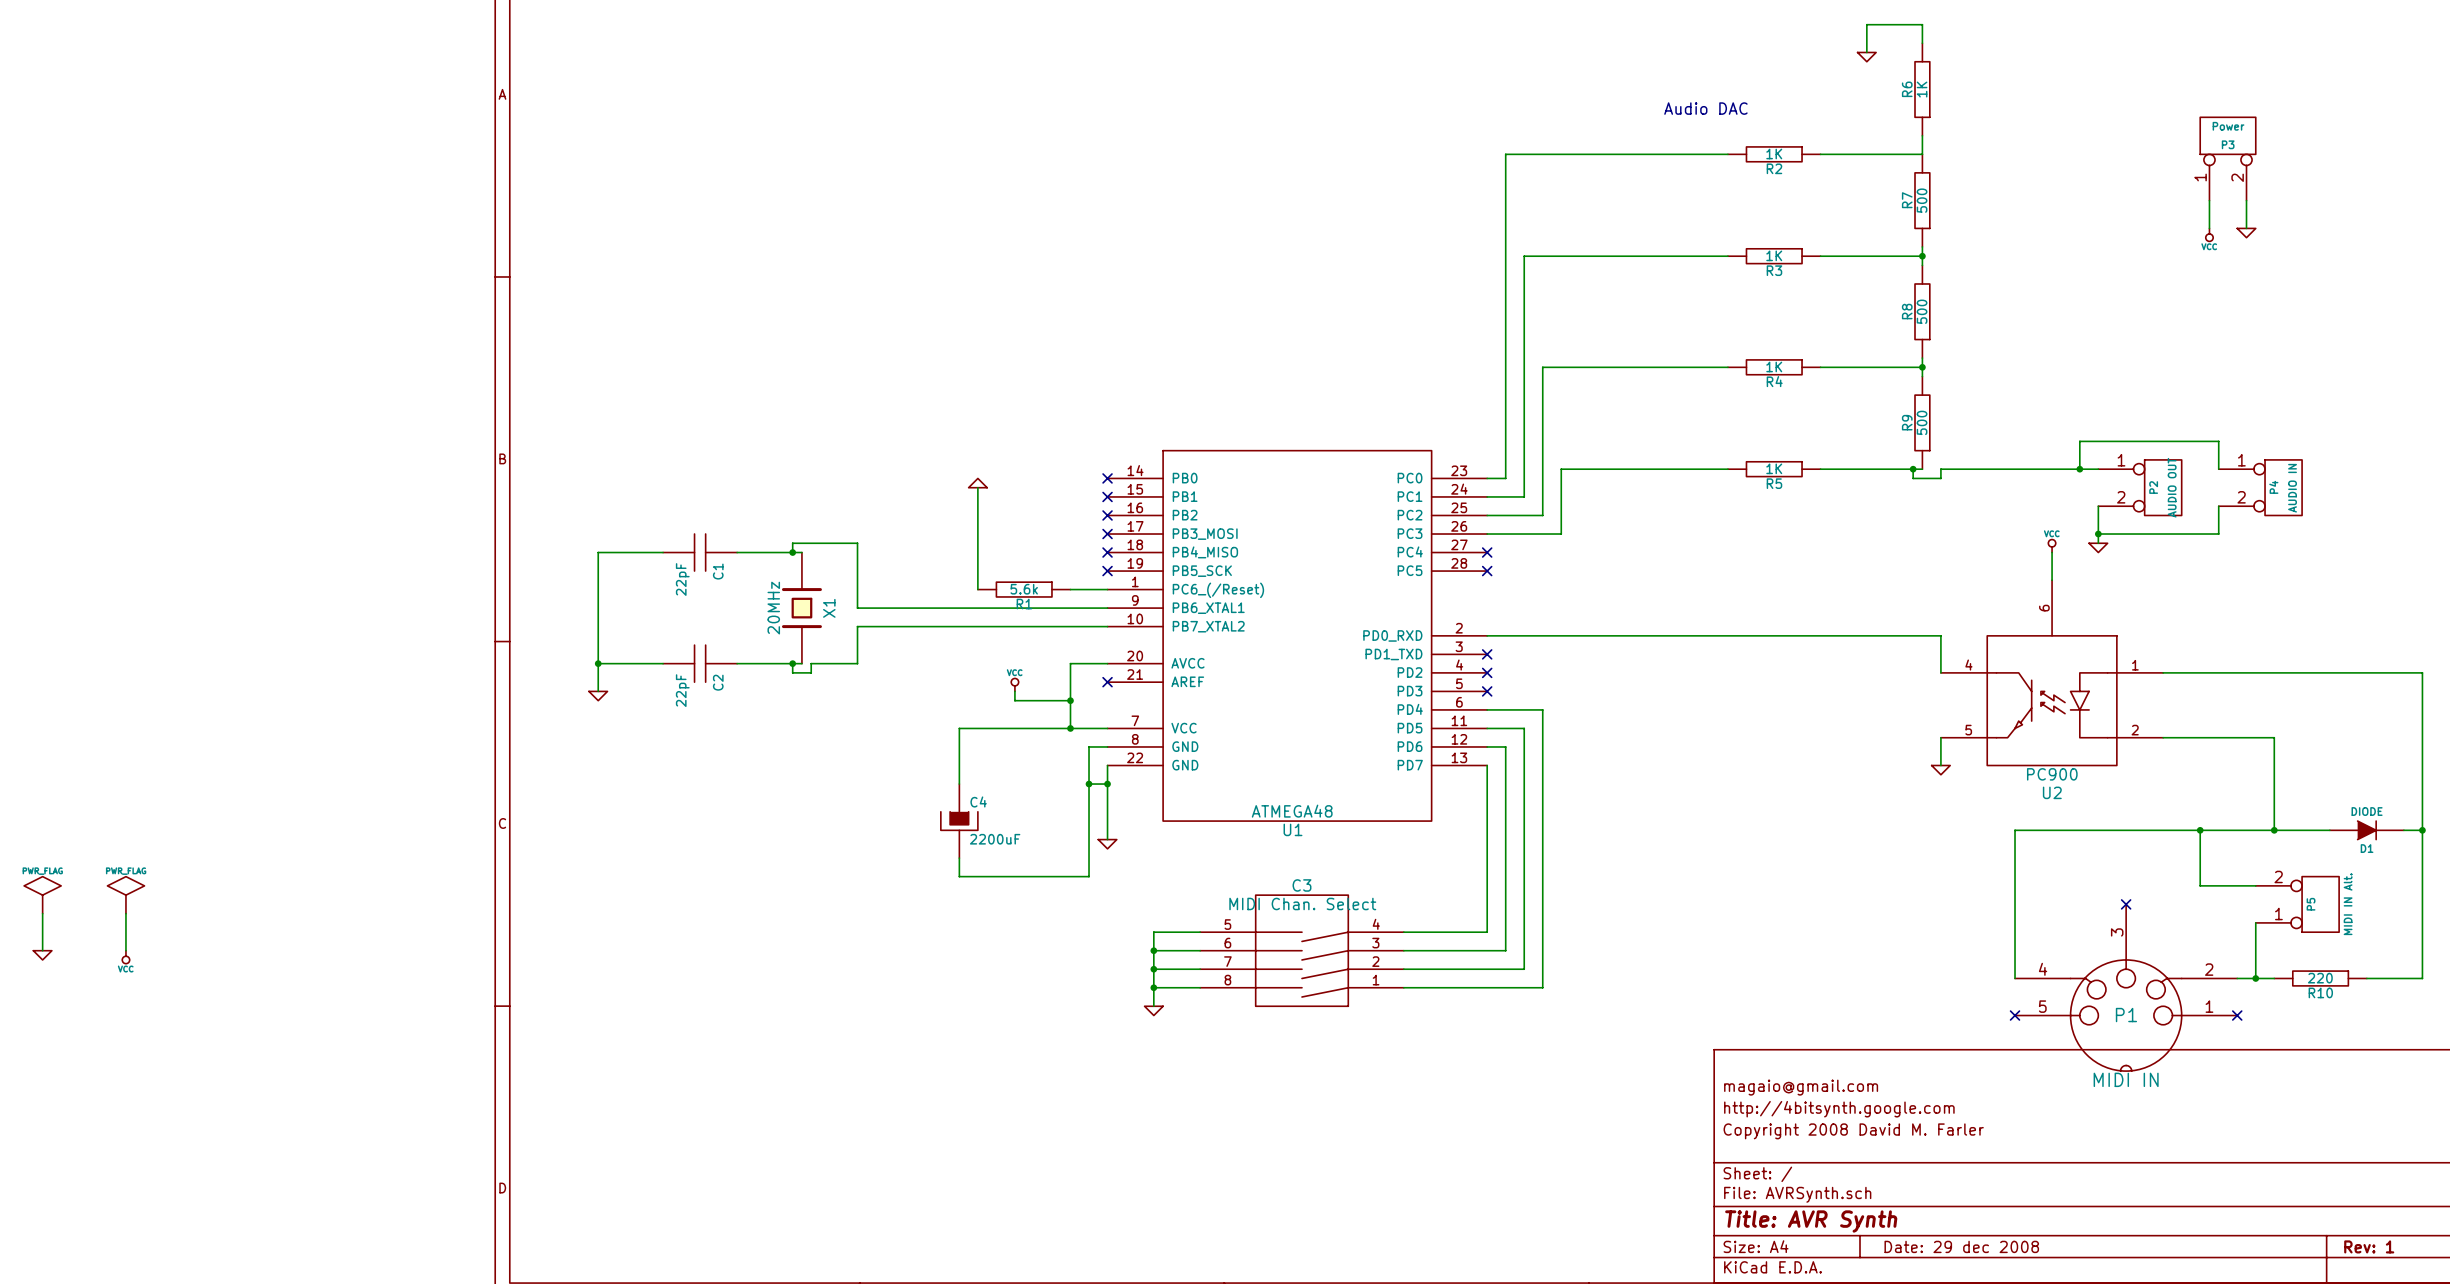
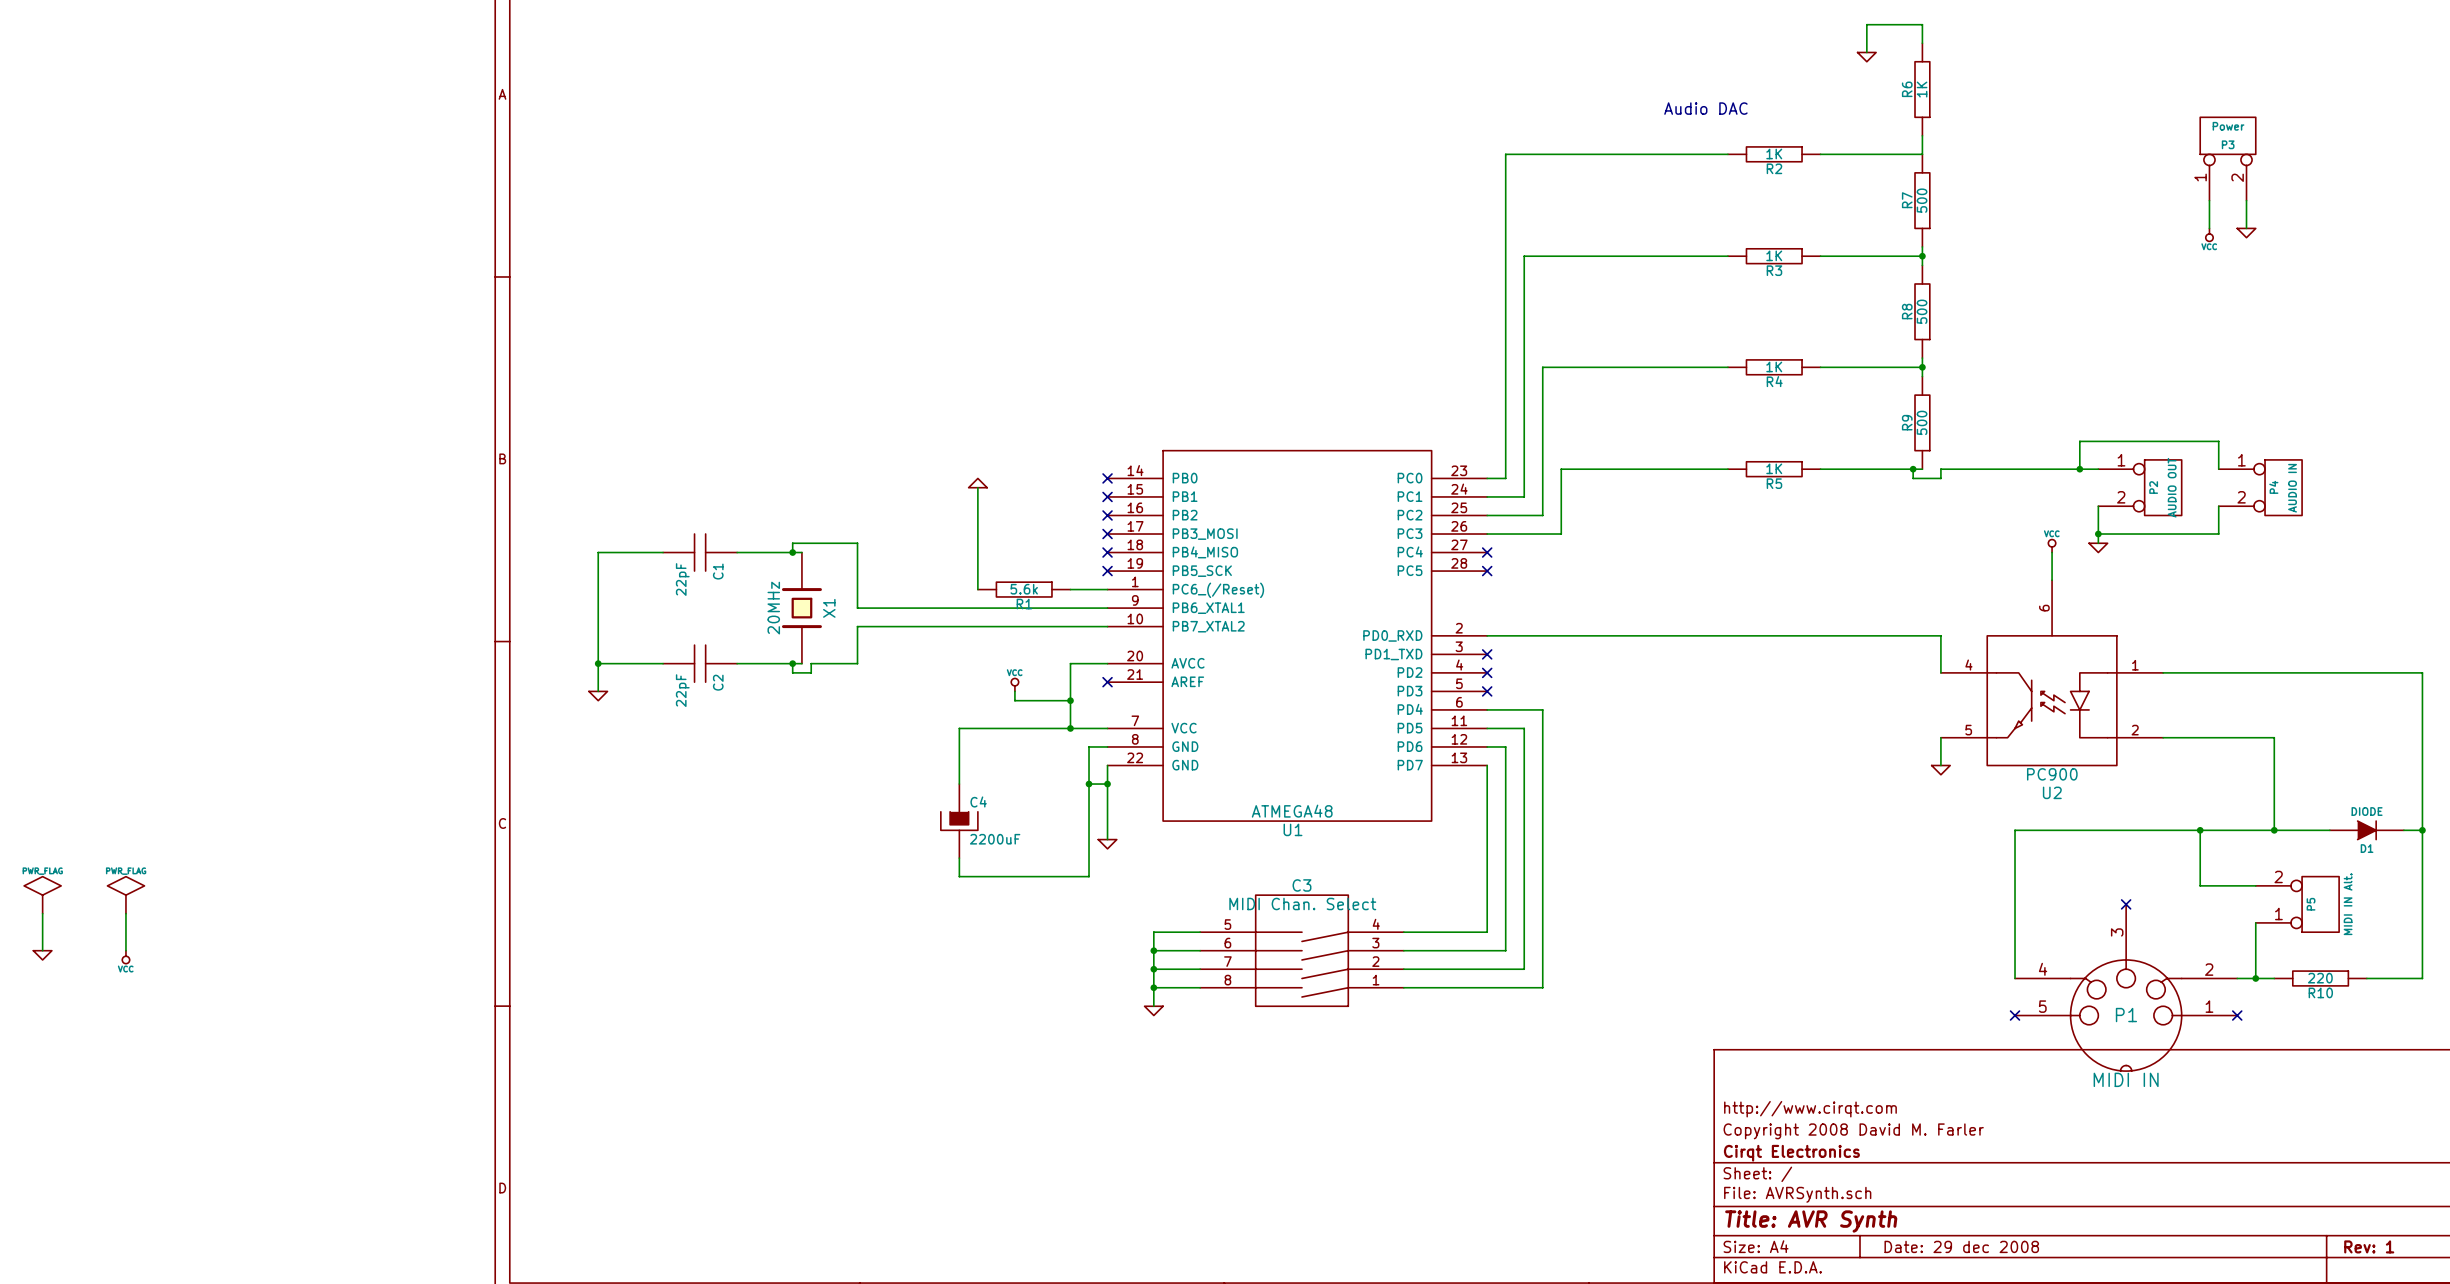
title block: magaio@gmail.com (1801, 1087) -> none
title block: http://4bitsynth.google.com (1839, 1109) -> http://www.cirqt.com (1810, 1109)
title block: none -> Cirqt Electronics (1791, 1153)

